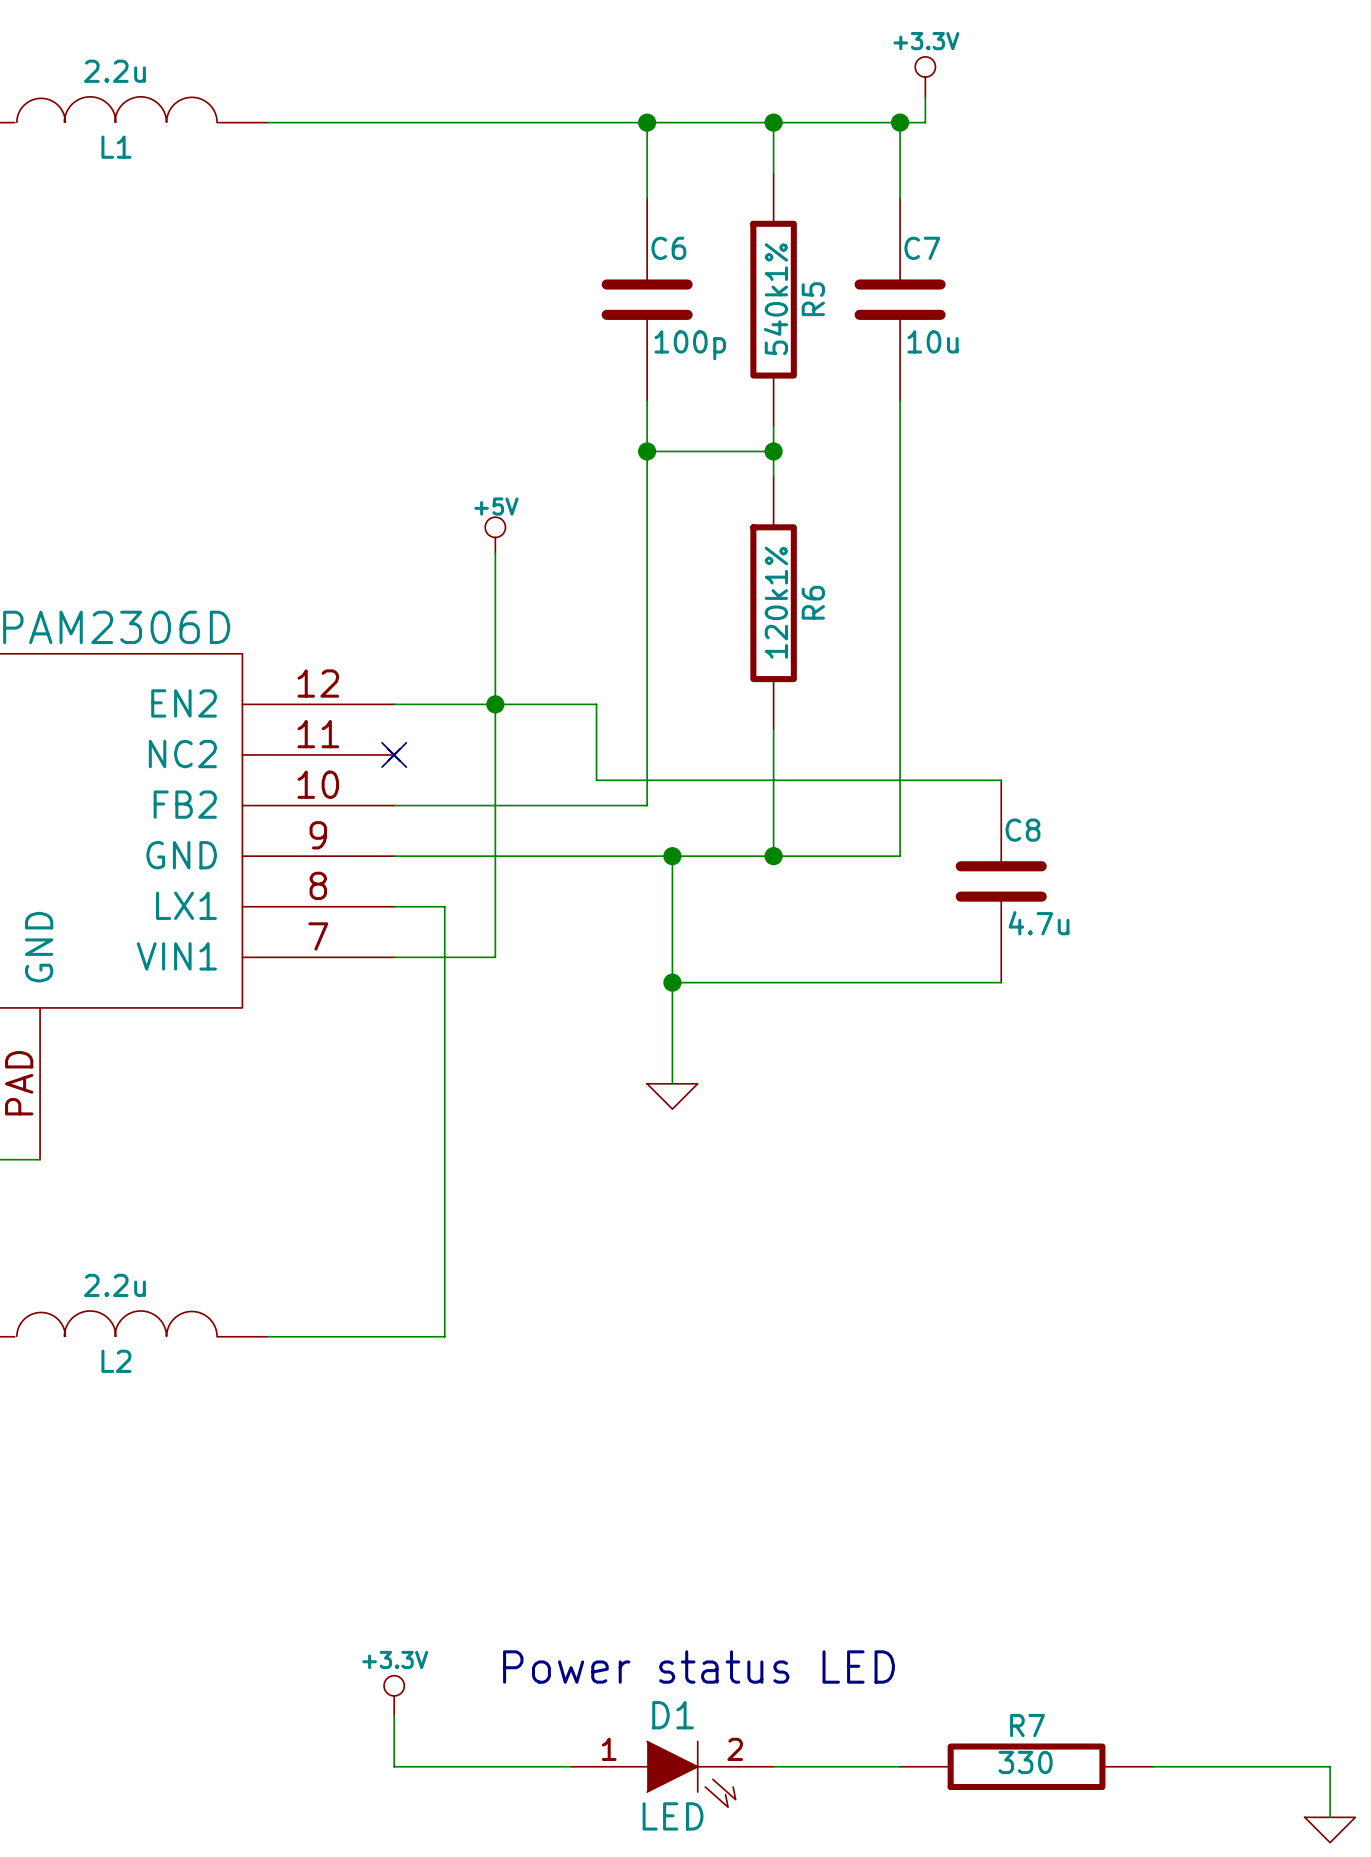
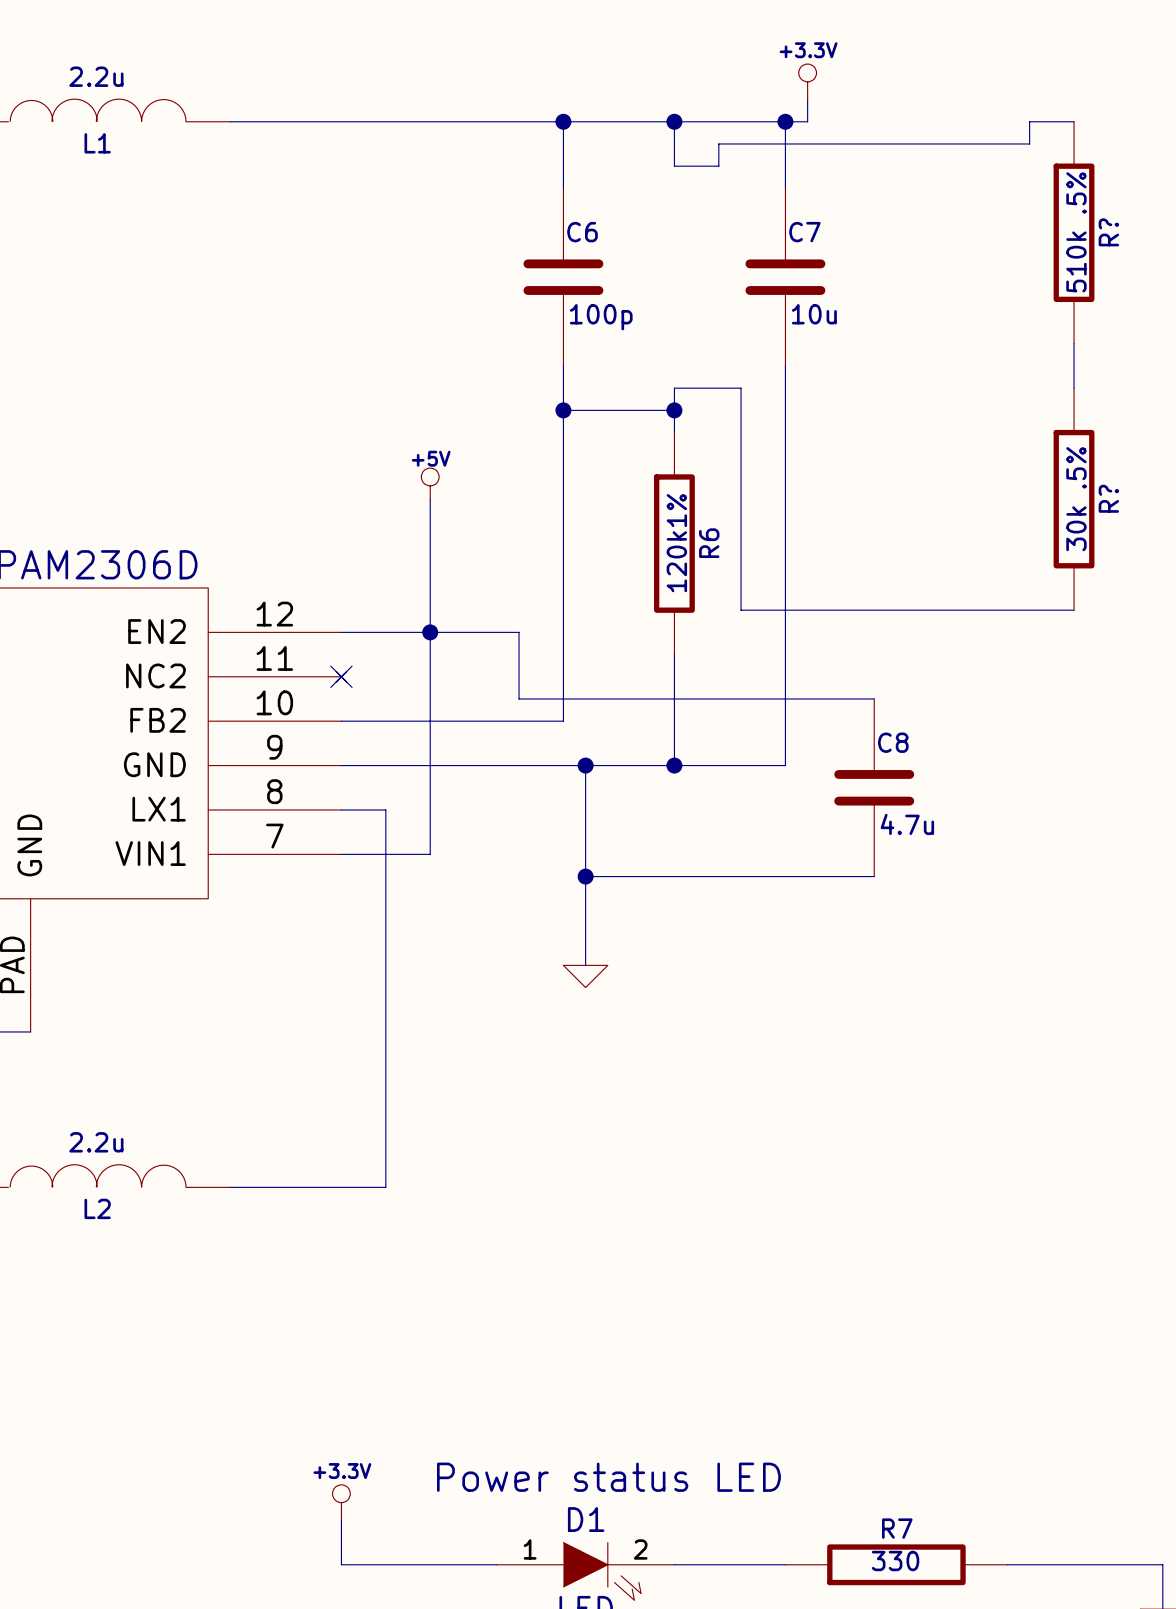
wire: none -> (1074, 121) (1029, 121) (1029, 143) (718, 143) (718, 166) (674, 166)
R?: none -> 510k .5% (1074, 232)
R5: 540k1% (773, 299) -> none
wire: none -> (1074, 343) (1074, 388)
wire: none -> (674, 388) (741, 388) (741, 610) (1074, 610)
R?: none -> 30k .5% (1074, 499)

